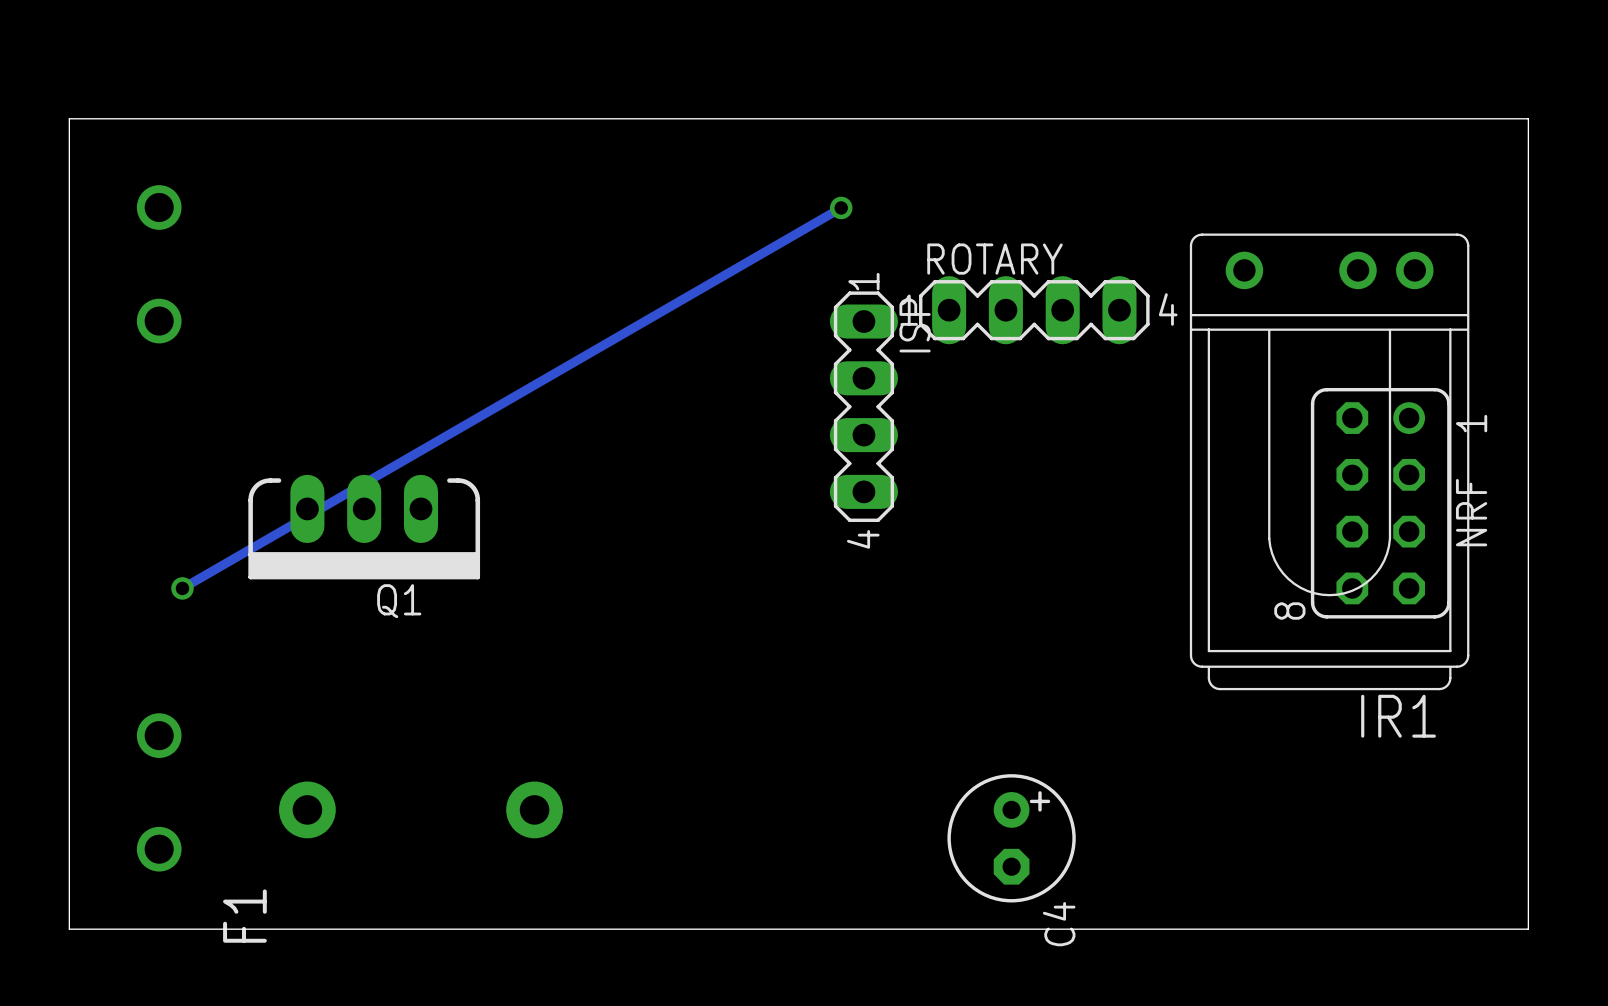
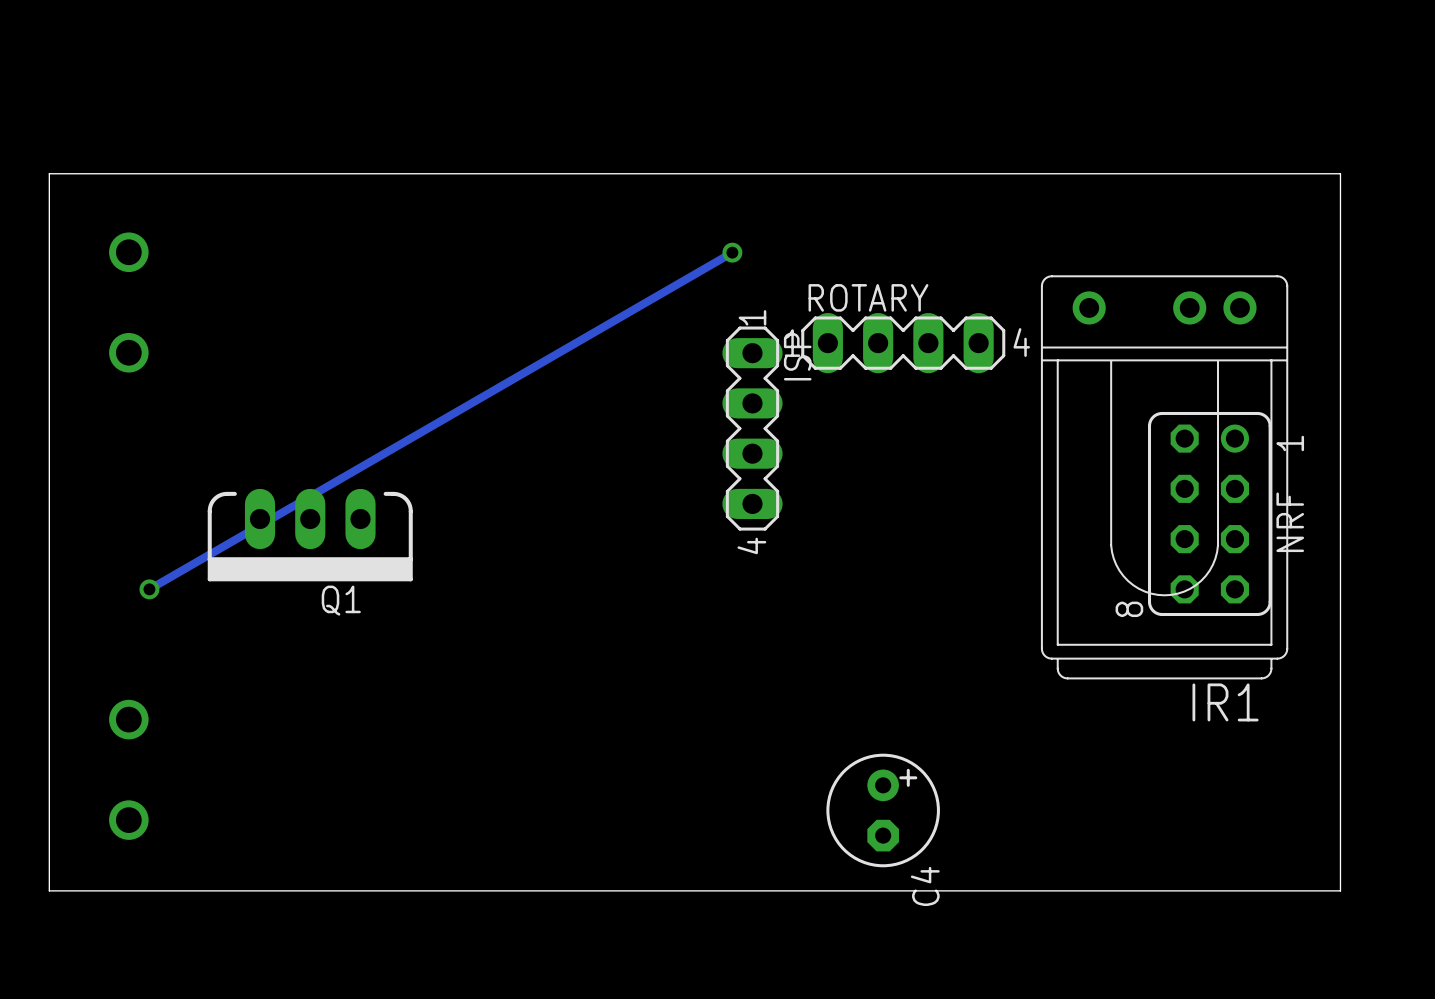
F1: (420, 809) -> none

